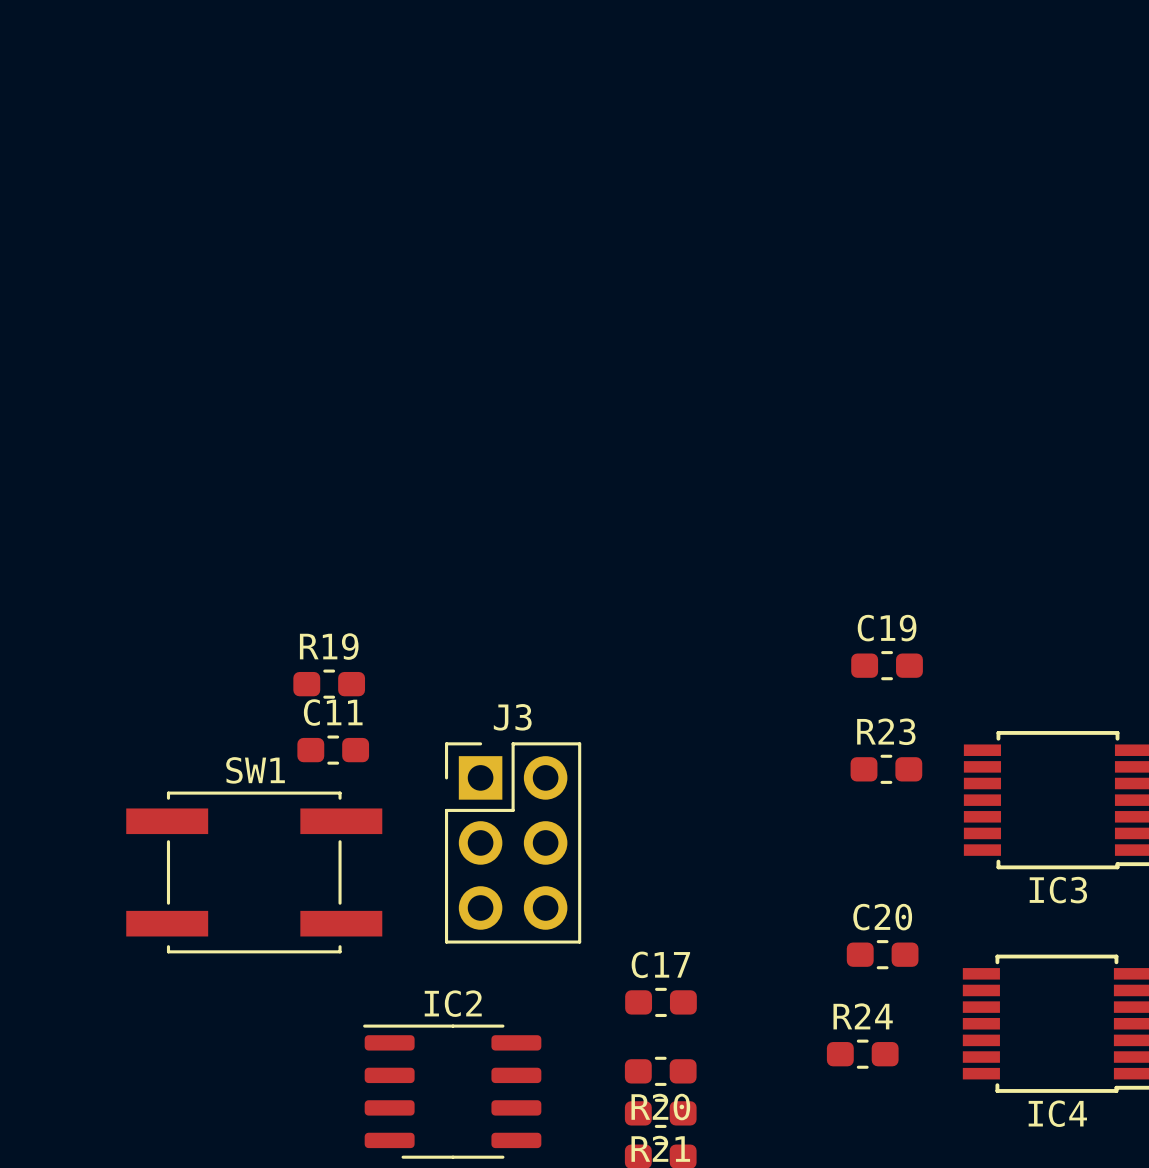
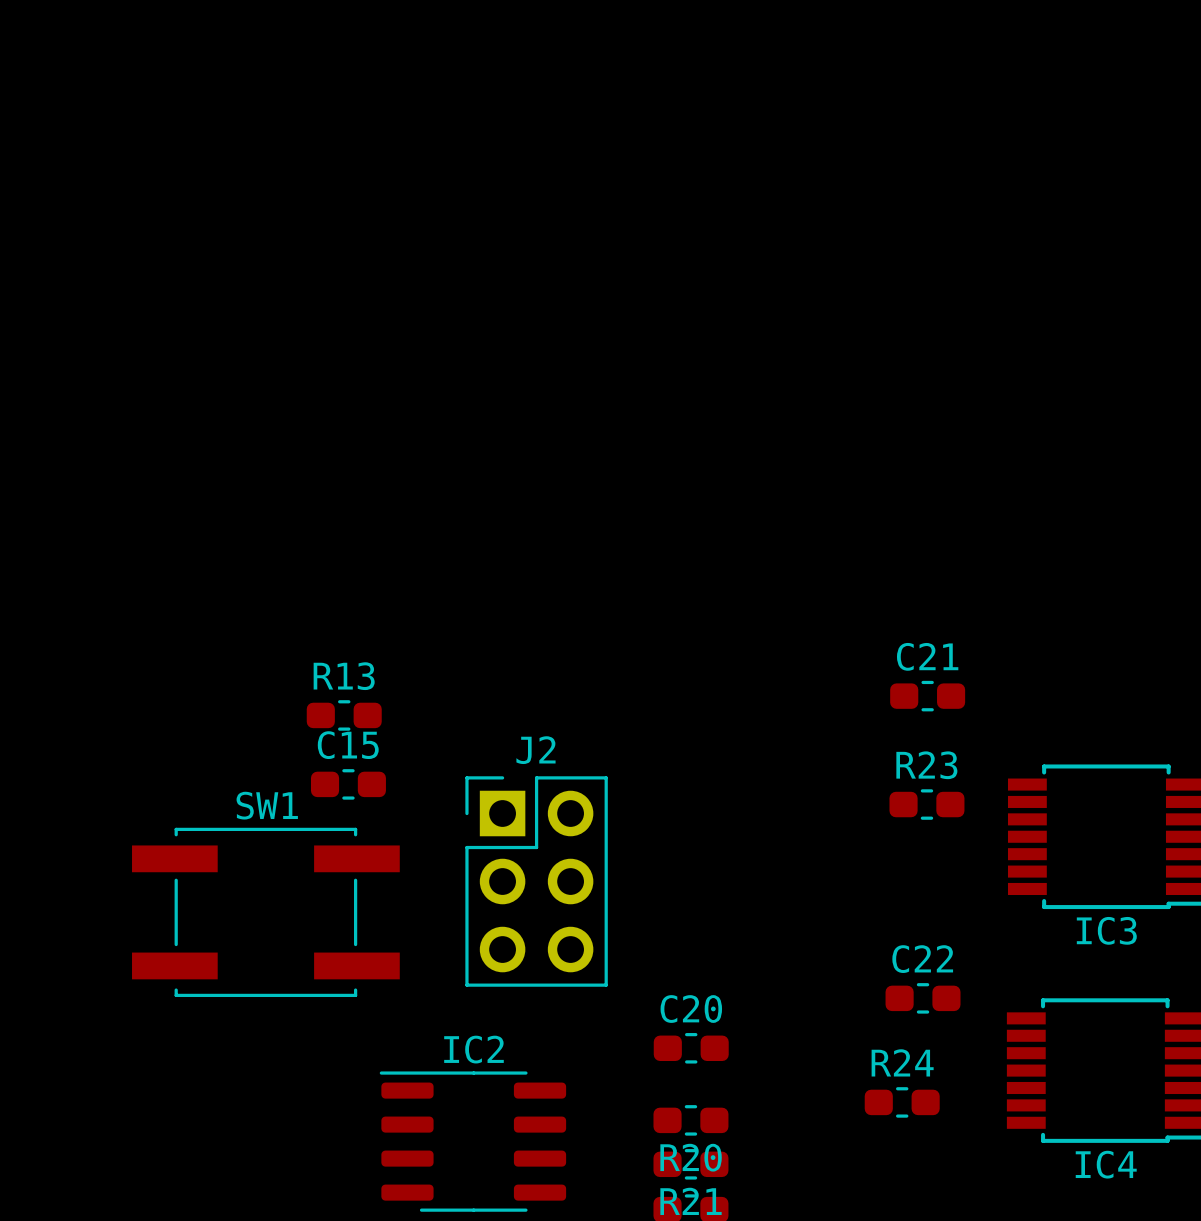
C19 name: C19 (887, 628) -> C21 (927, 656)
R19 name: R19 (329, 646) -> R13 (344, 676)
C11 name: C11 (333, 712) -> C15 (348, 745)
J3 name: J3 (512, 717) -> J2 (536, 750)
C20 name: C20 (882, 917) -> C22 (922, 959)
C17 name: C17 (660, 964) -> C20 (691, 1009)

